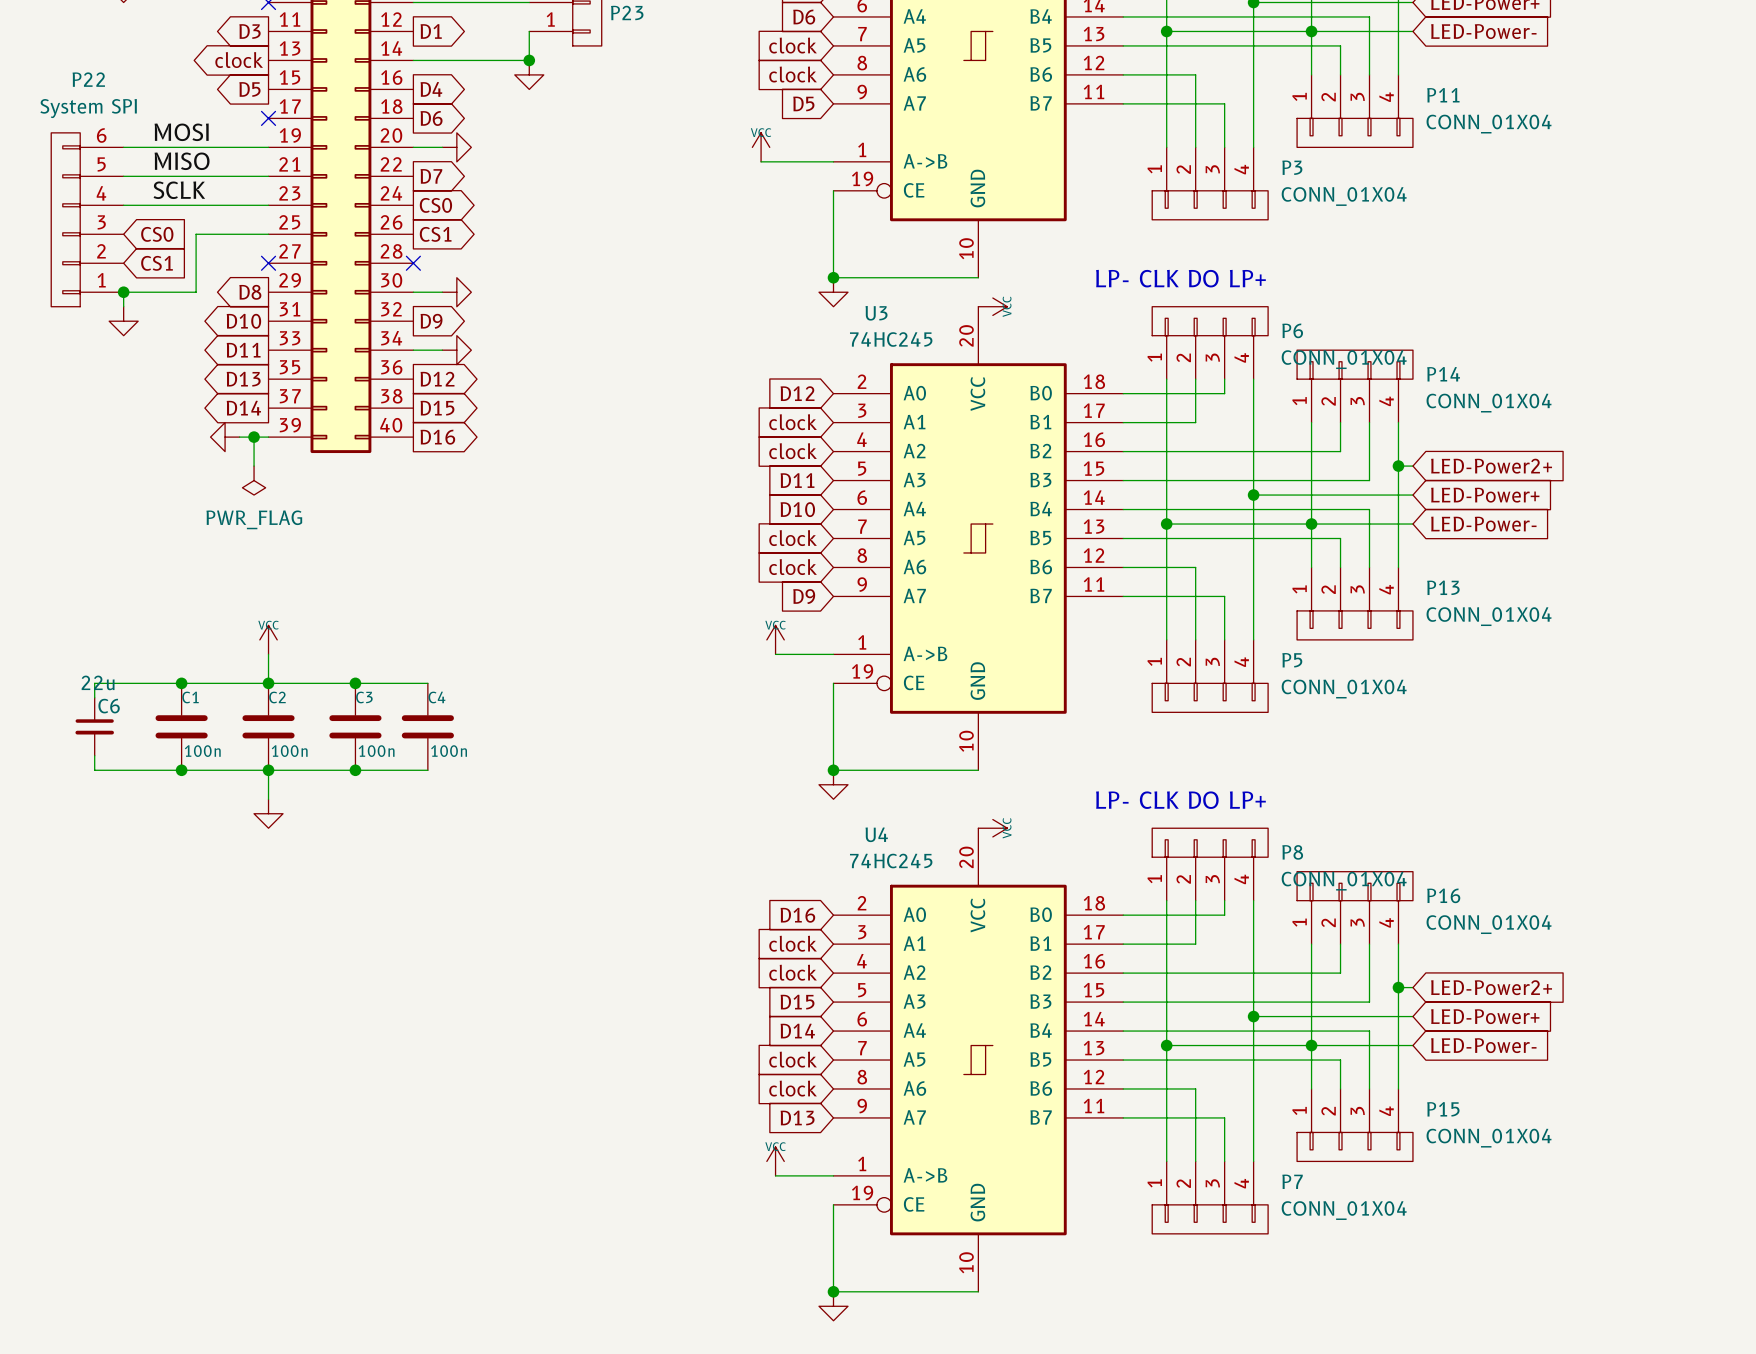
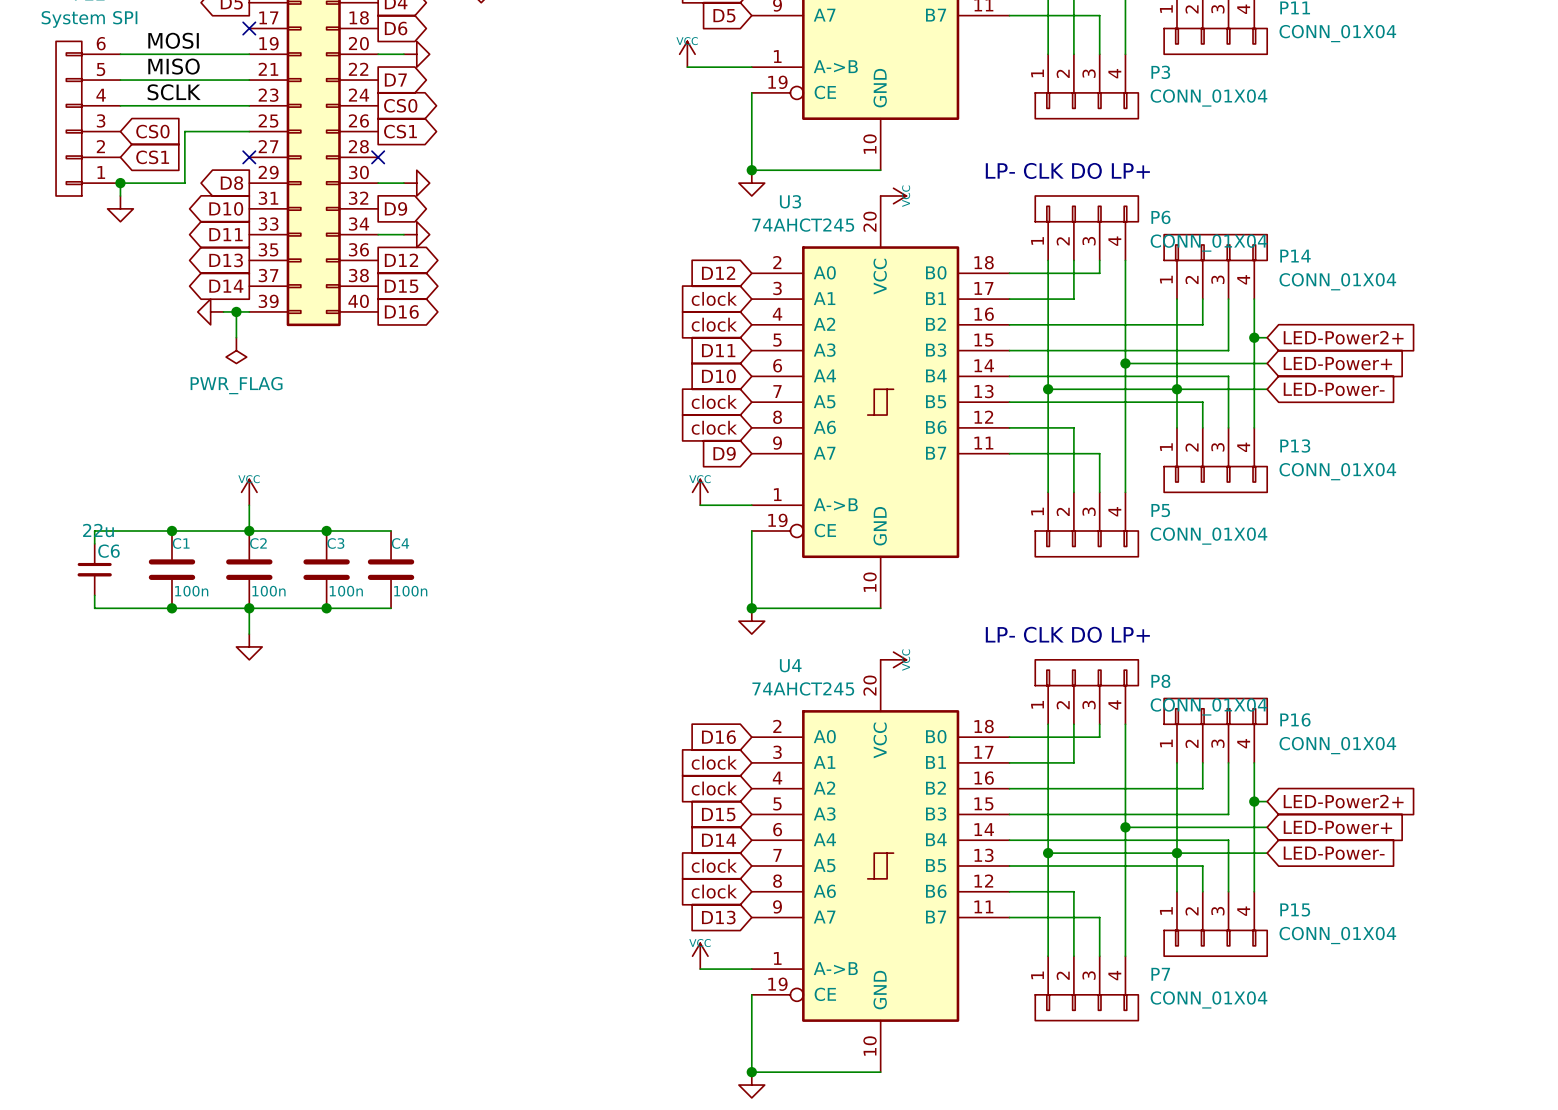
U3 value: 74HC245 (891, 339) -> 74AHCT245 (803, 225)
U4 value: 74HC245 (891, 861) -> 74AHCT245 (803, 688)

